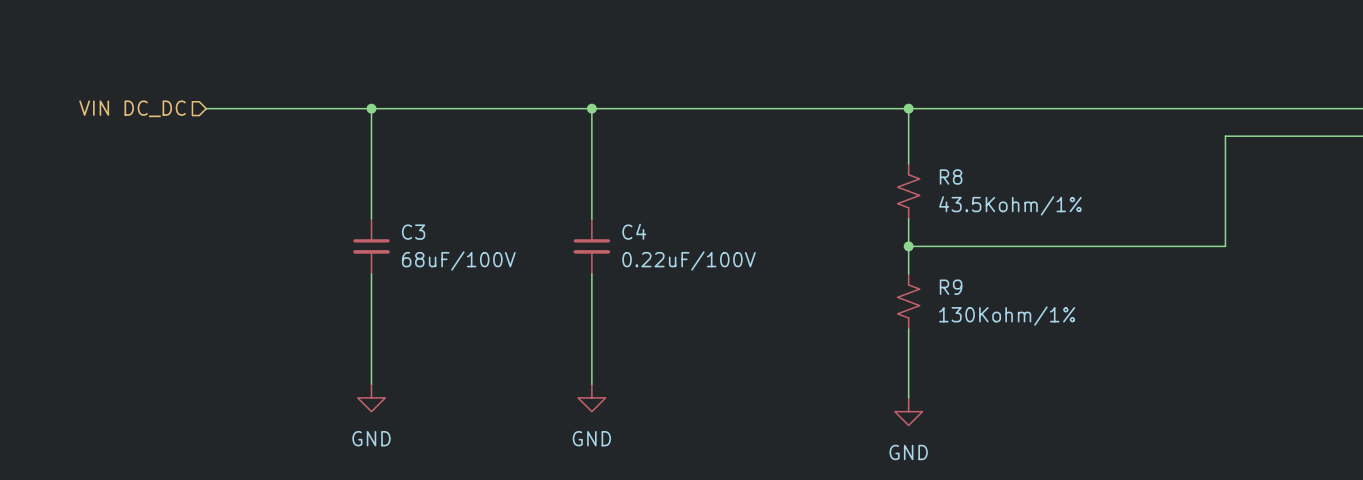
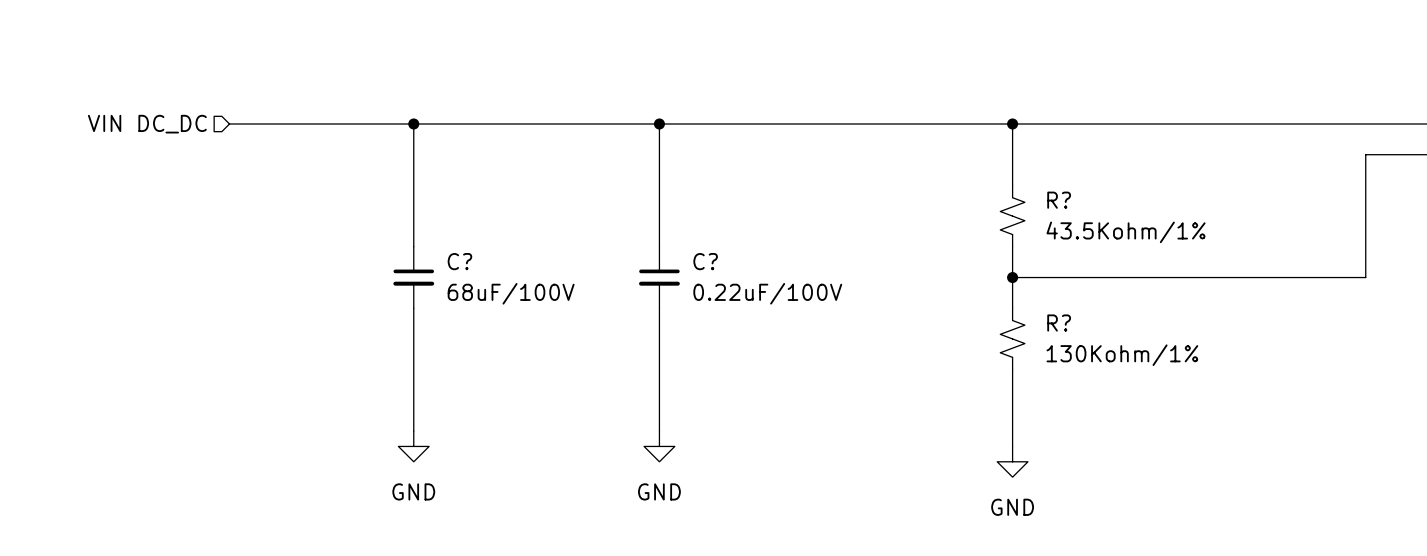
R8 name: R8 (951, 177) -> R? (1059, 200)
C4 name: C4 (634, 231) -> C? (705, 261)
C3 name: C3 (413, 232) -> C? (459, 261)
R9 name: R9 (951, 287) -> R? (1059, 323)

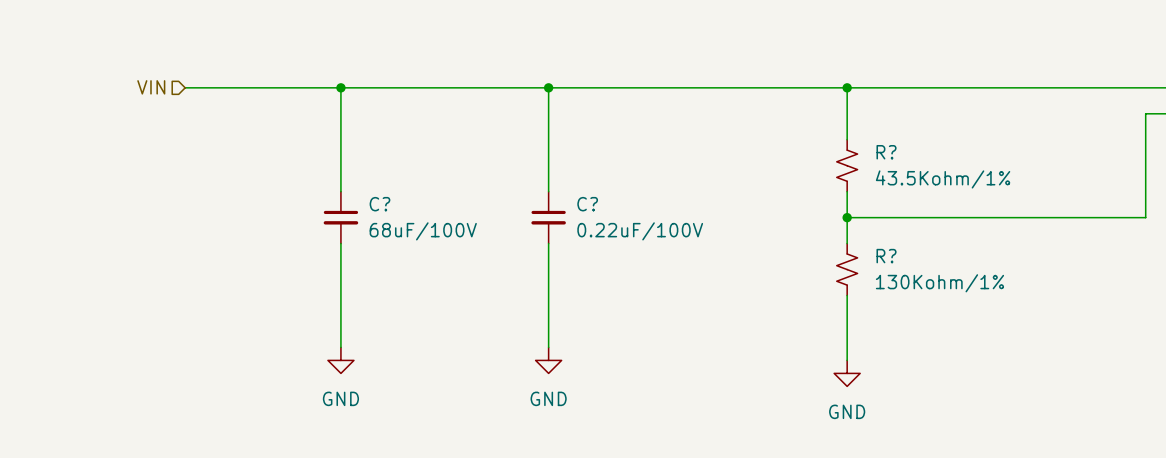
hierarchical label: VIN DC_DC (147, 124) -> VIN (151, 87)

